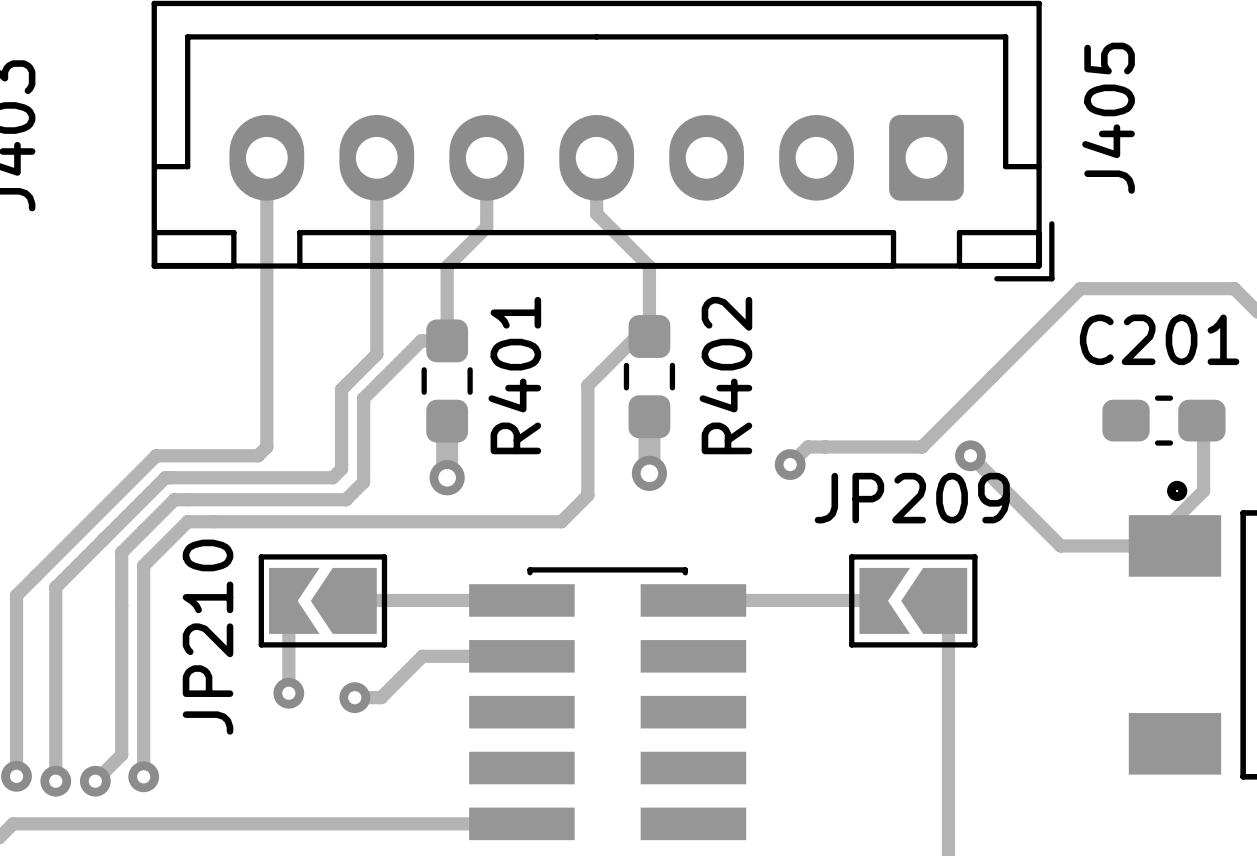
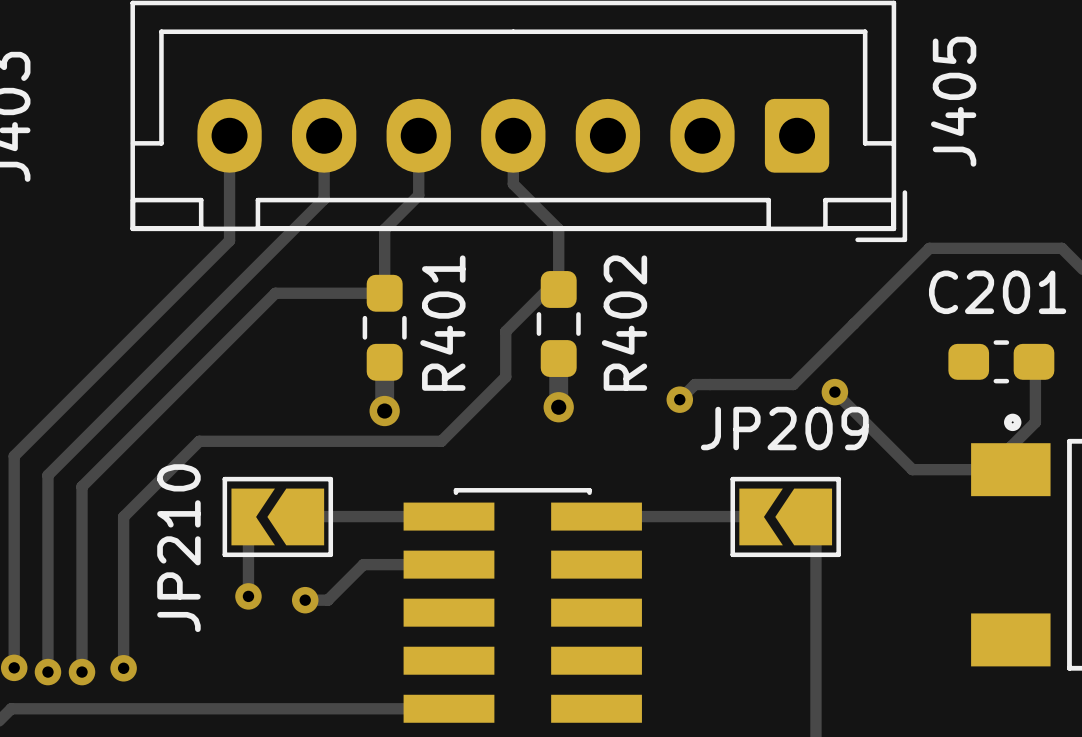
track: (376, 231) (376, 354) (341, 389) (341, 468) (332, 477) (165, 477) (55, 587) -> (324, 199) (47, 475) (47, 505)
track: (266, 279) (266, 446) (258, 455) (156, 455) (16, 595) -> (229, 240) (14, 456) (14, 512)
track: (421, 340) (363, 398) (363, 482) (346, 499) (174, 499) (121, 552) (121, 754) (95, 781) -> (362, 293) (275, 293) (82, 486) (82, 672)
track: (587, 438) (587, 495) (561, 521) (187, 521) (143, 565) (143, 600) -> (505, 376) (441, 441) (199, 441) (123, 516)

